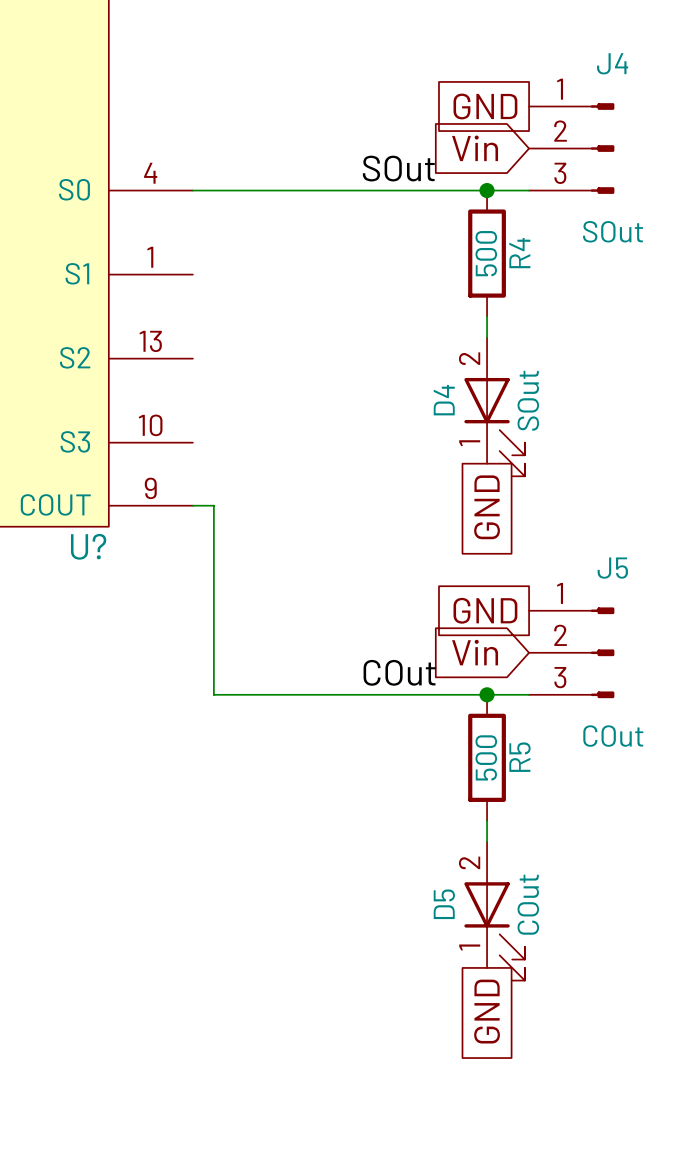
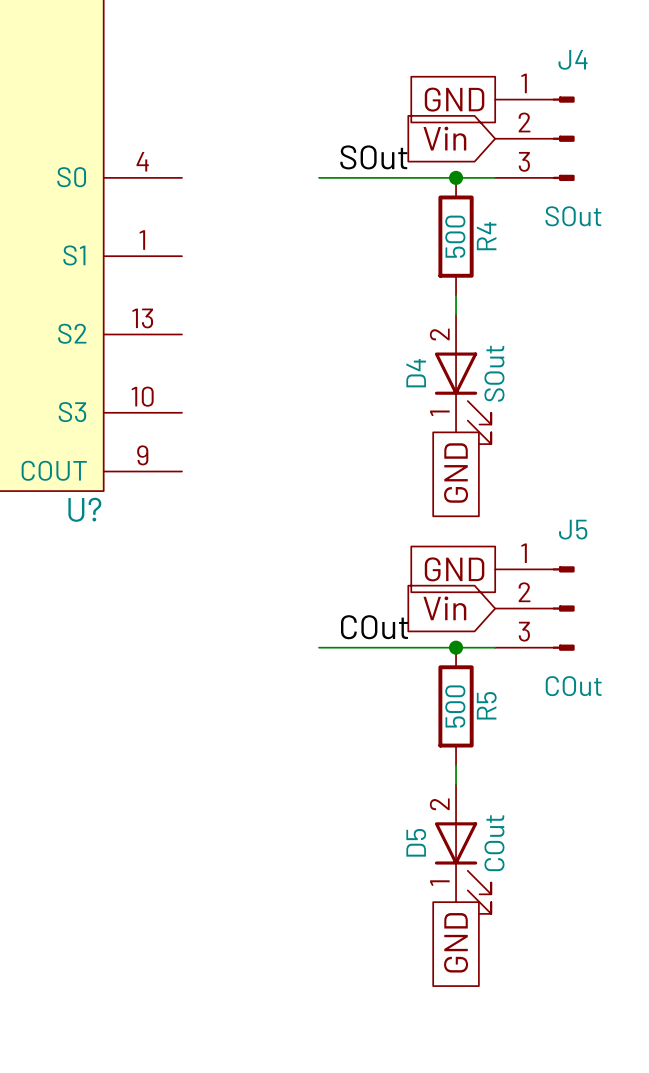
wire: (192, 190) (339, 190) -> none
wire: (192, 505) (213, 505) (213, 694) (339, 694) -> none

